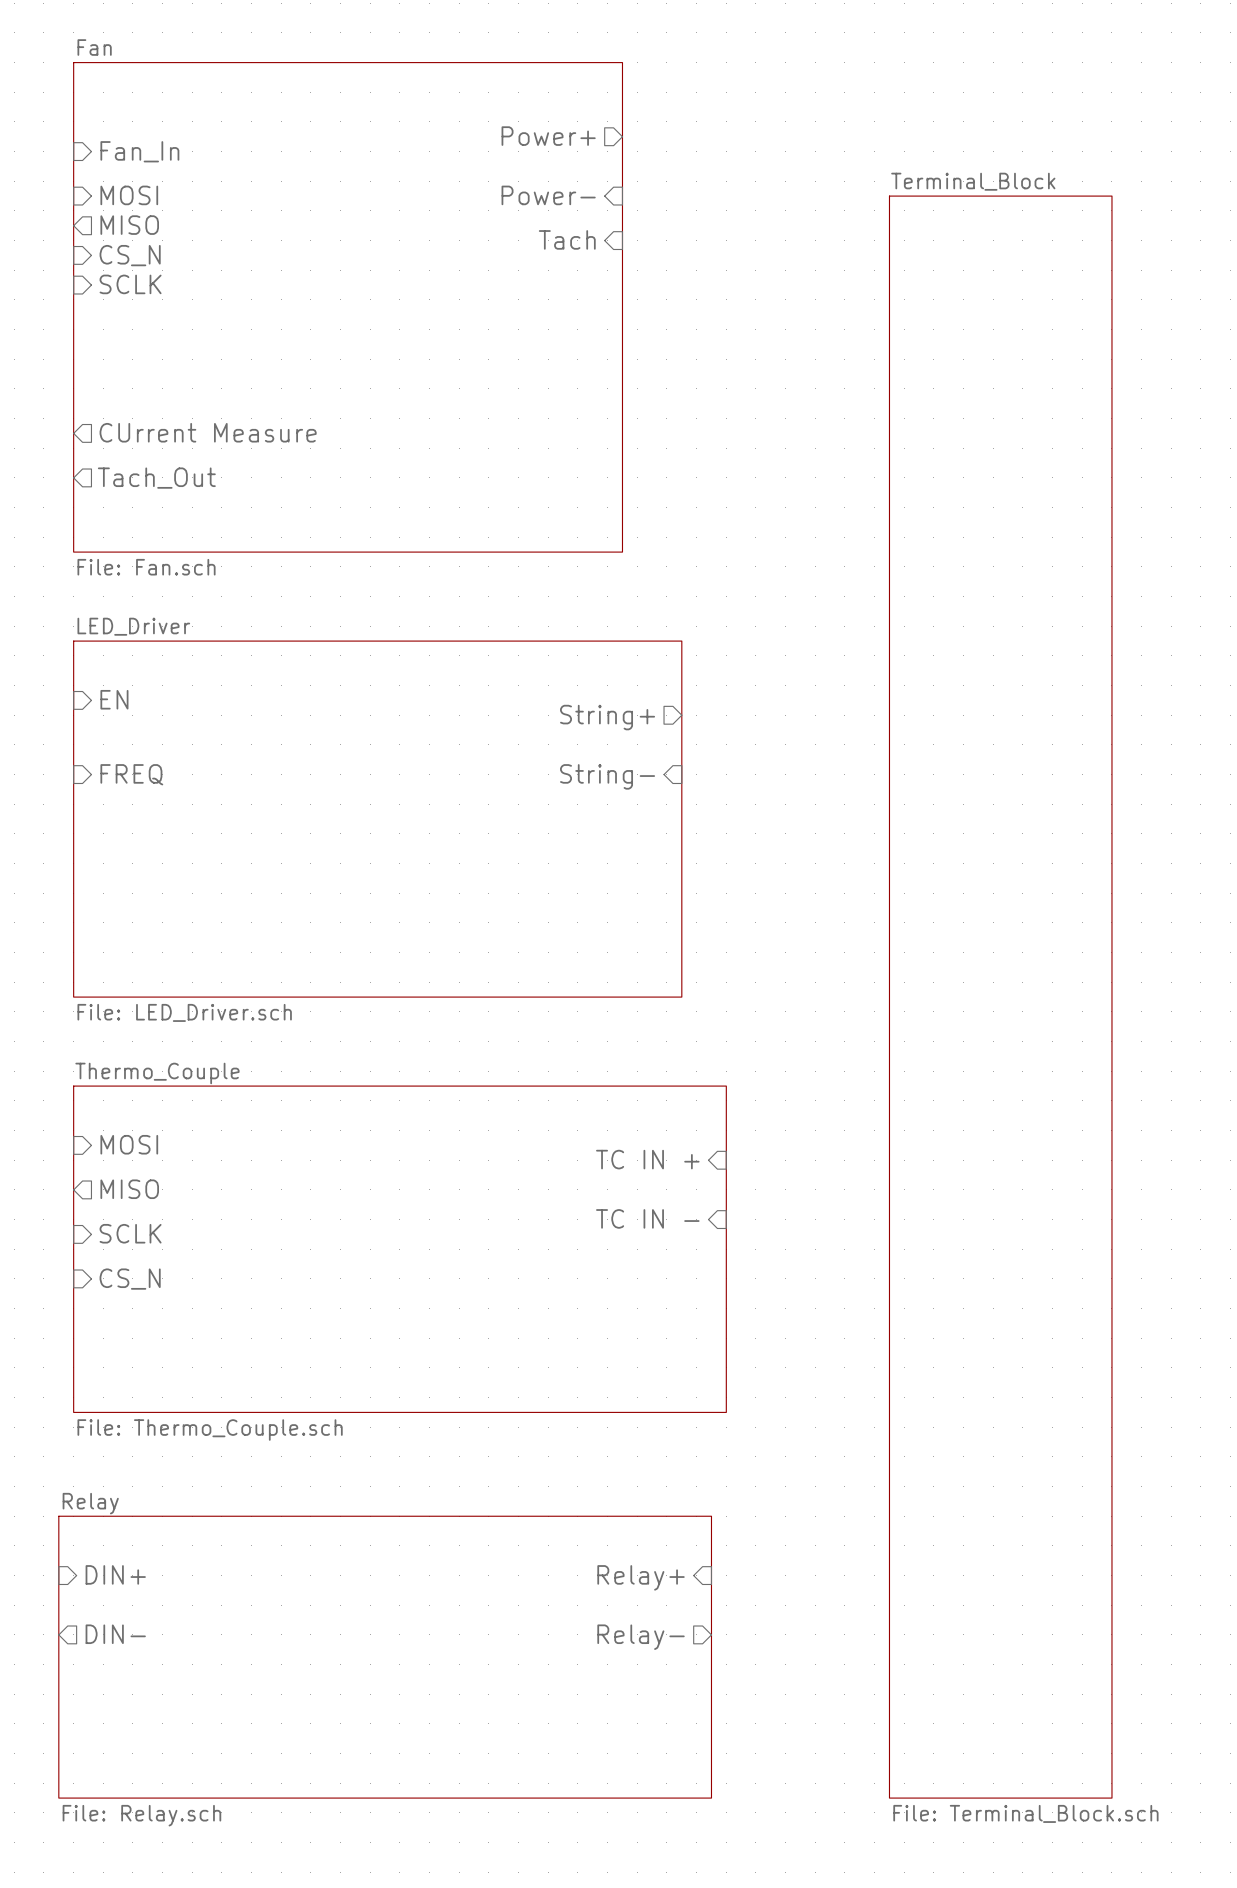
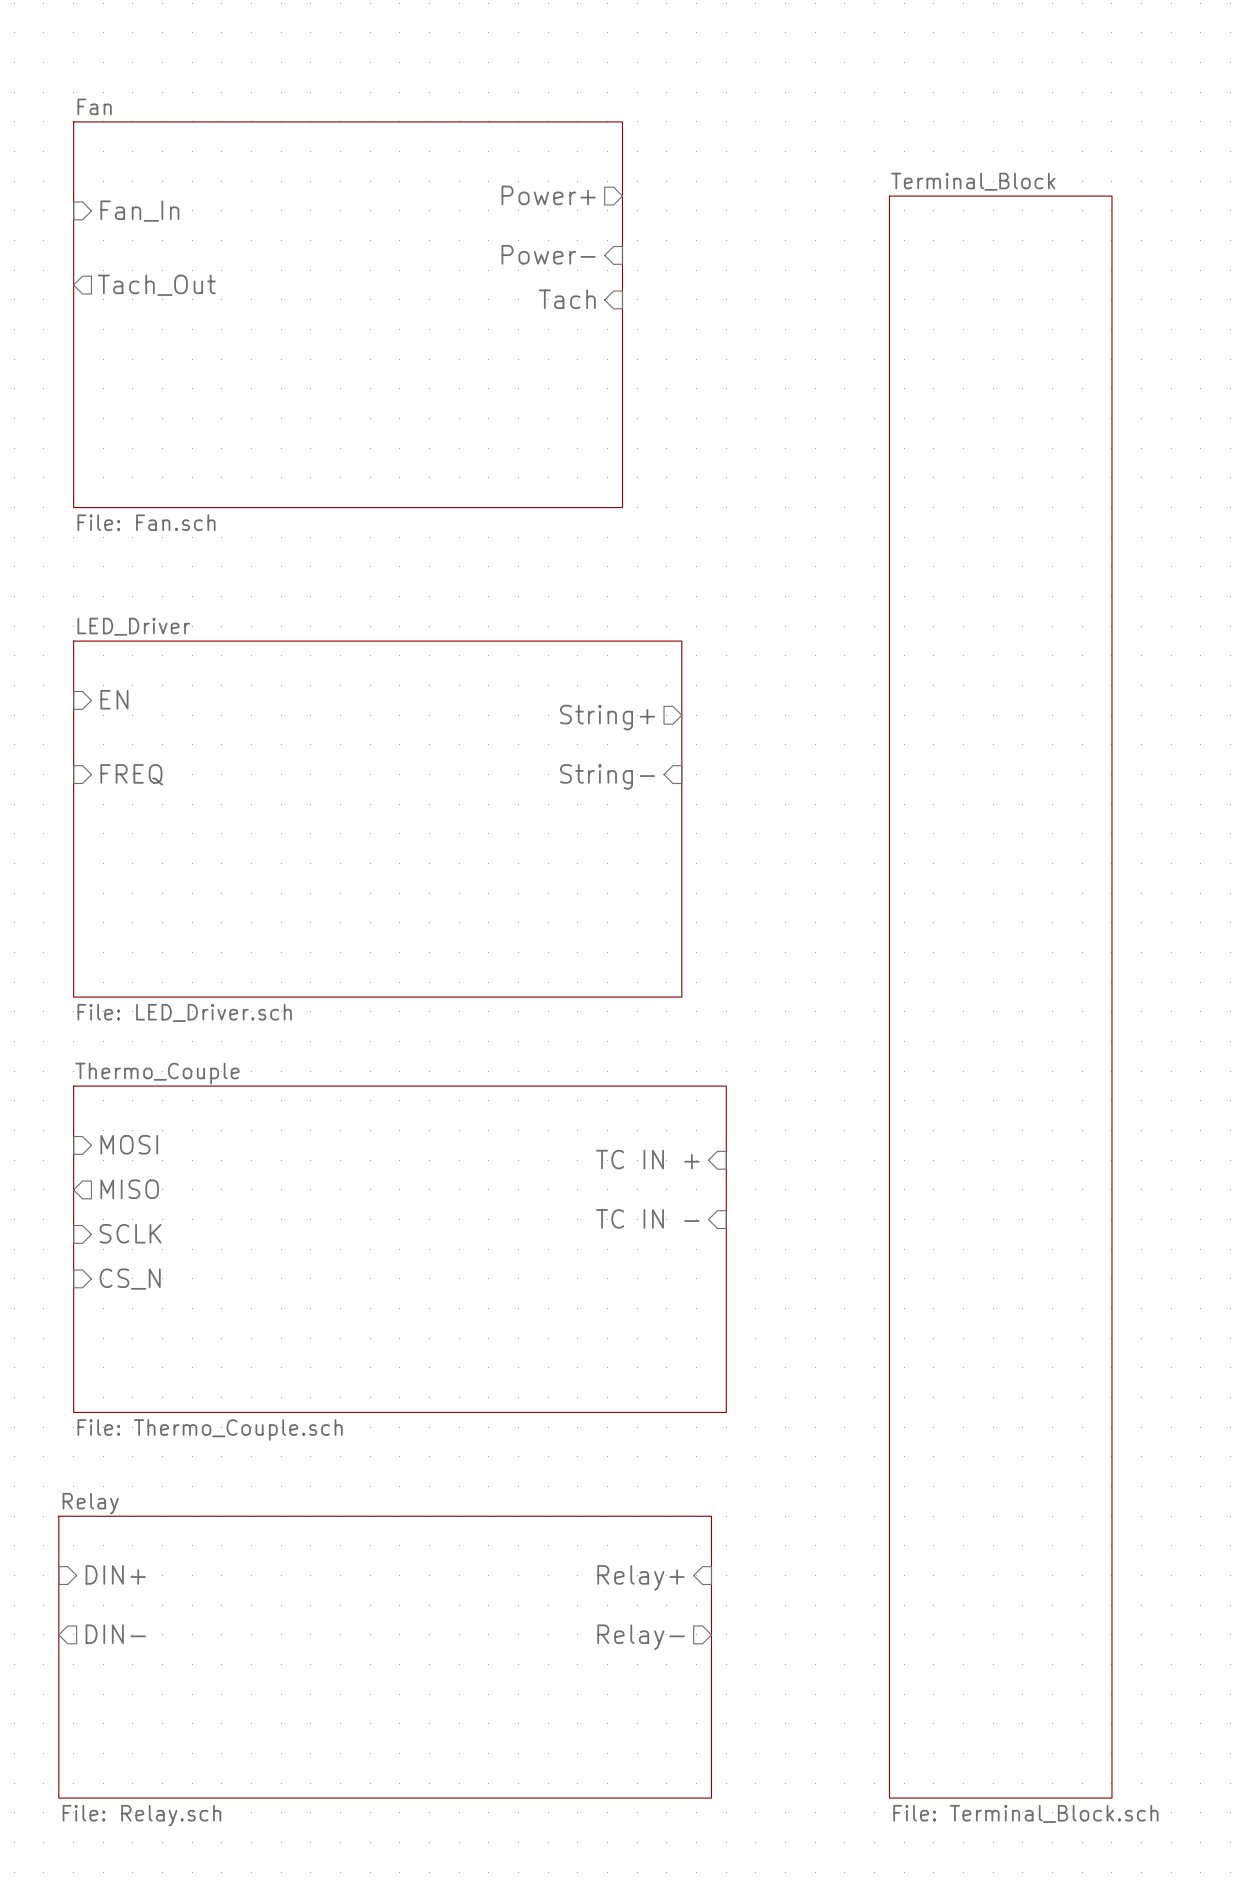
sheet Fan name position: Fan (94, 47) -> Fan (94, 106)
sheet Fan shape: [73, 62, 623, 553] -> [73, 121, 623, 508]
sheet pin: Power+ (548, 136) -> none
sheet pin position: Fan_In (139, 151) -> Fan_In (139, 211)
sheet pin: MOSI (129, 195) -> none
sheet pin shape: input (548, 195) -> output (548, 195)
sheet pin: Power- (548, 195) -> Power+ (548, 195)
sheet pin: MISO (129, 225) -> none
sheet pin position: Tach (567, 239) -> Tach (567, 299)
sheet pin: none -> Power- (548, 254)
sheet pin: CS_N (130, 255) -> none
sheet pin shape: input (130, 284) -> output (156, 285)
sheet pin: SCLK (130, 284) -> Tach_Out (156, 285)
sheet pin: CUrrent Measure (208, 432) -> none
sheet pin: Tach_Out (156, 478) -> none
sheet Fan value position: File: Fan.sch (146, 567) -> File: Fan.sch (146, 522)

